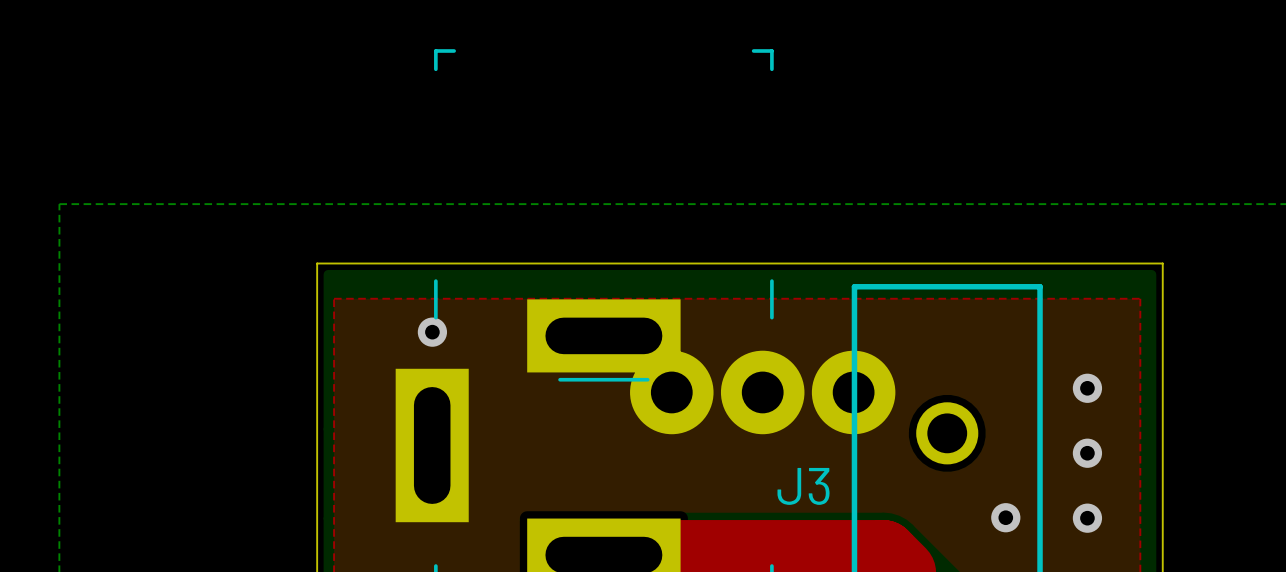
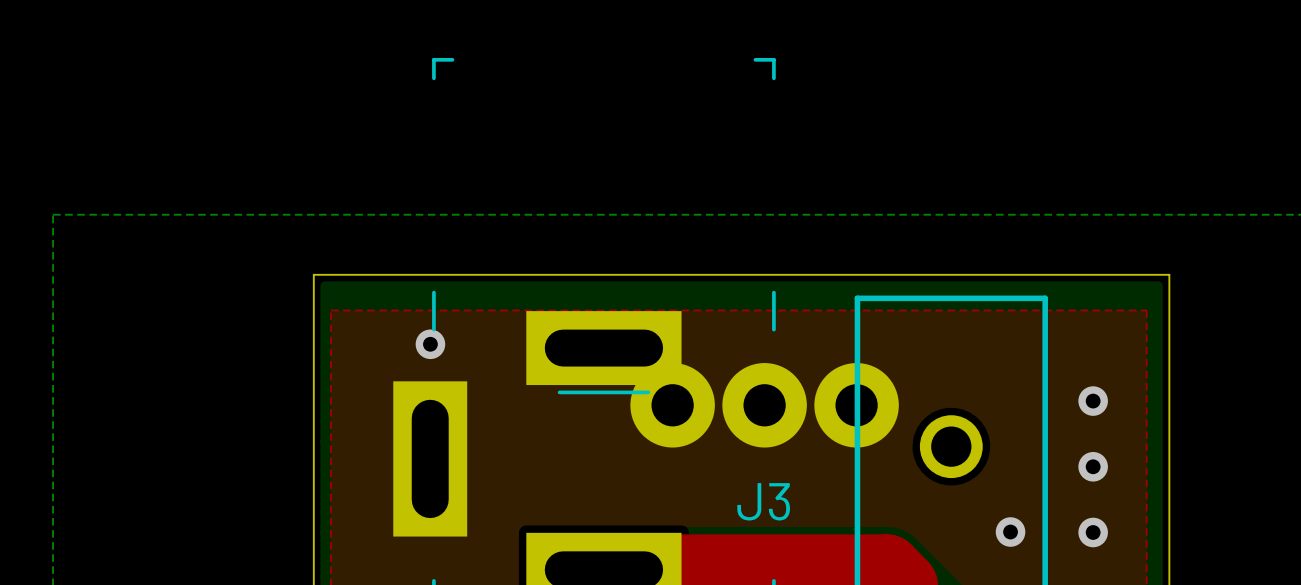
J3 name position: J3 (803, 486) -> J3 (763, 501)

